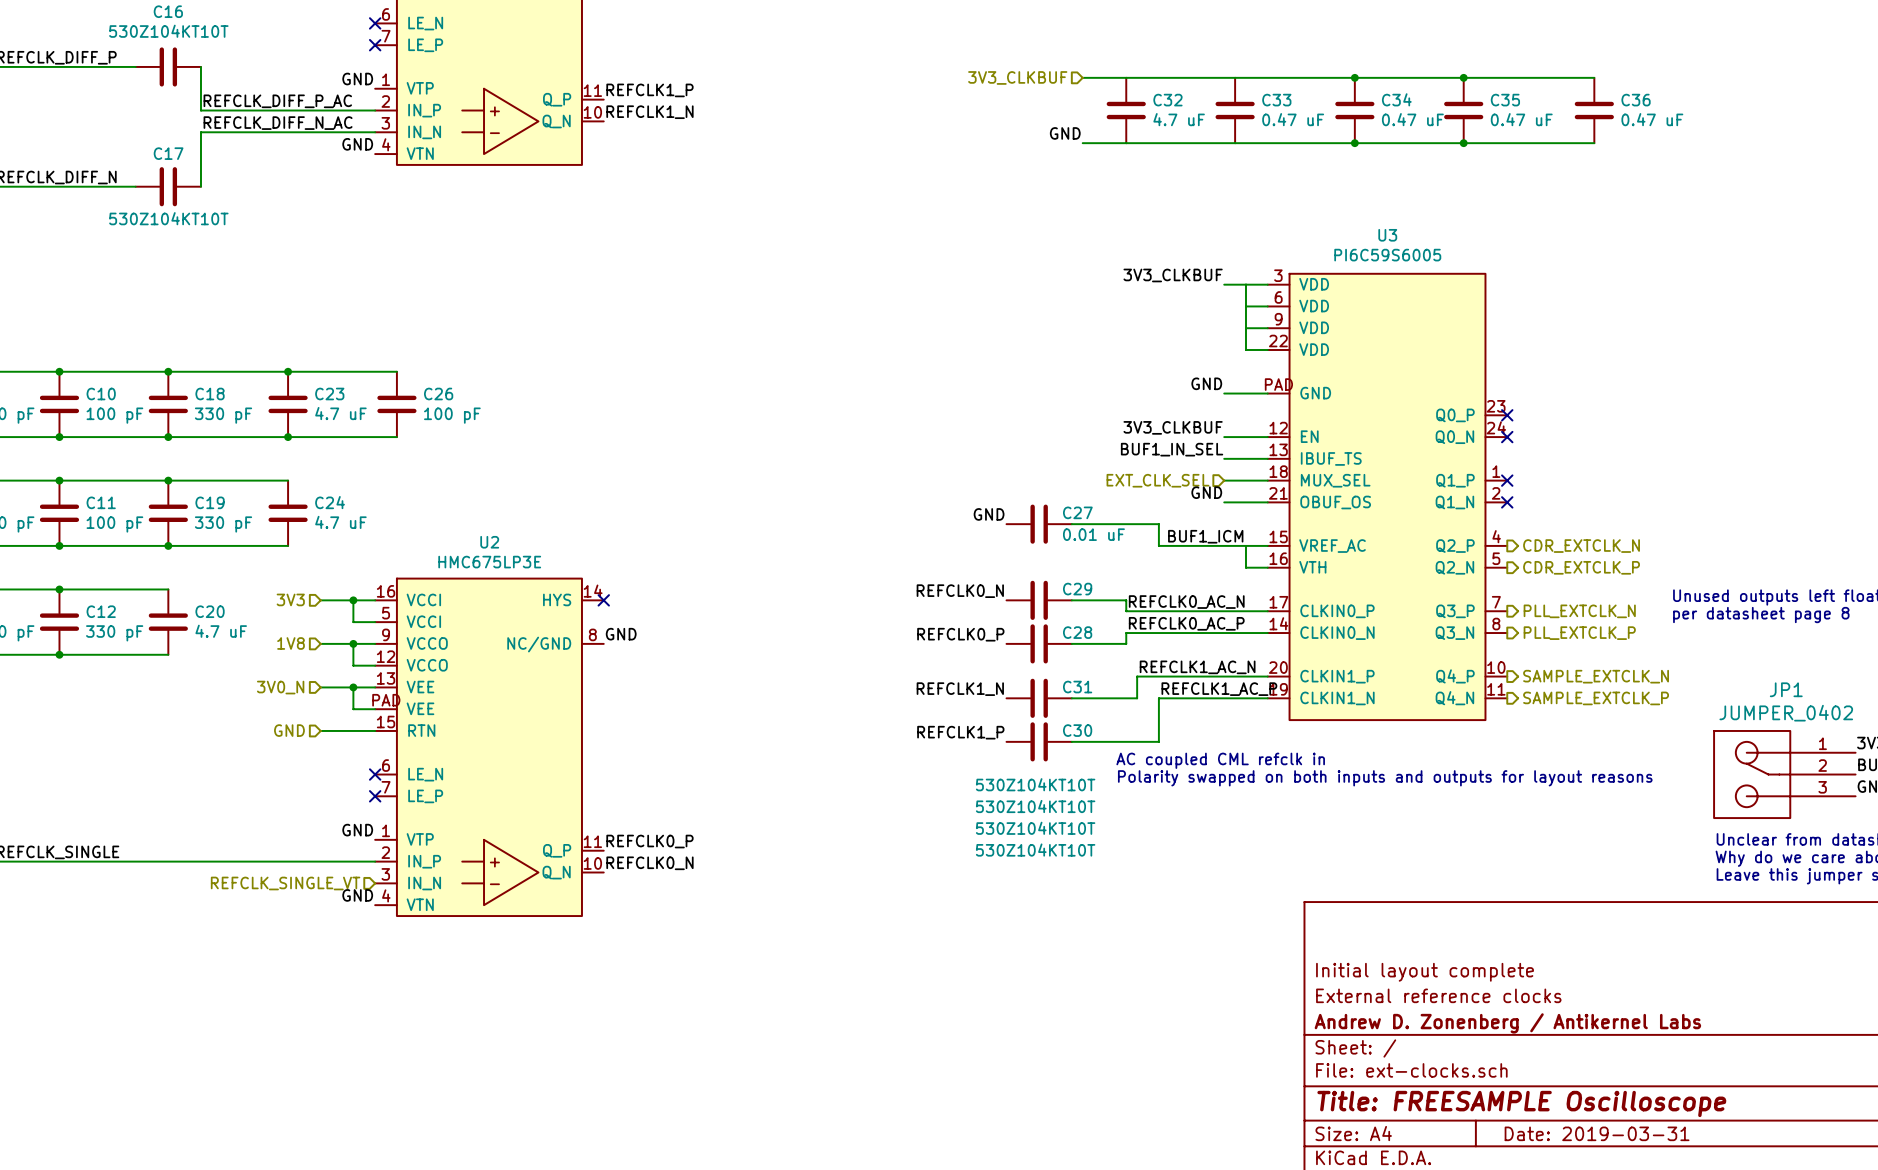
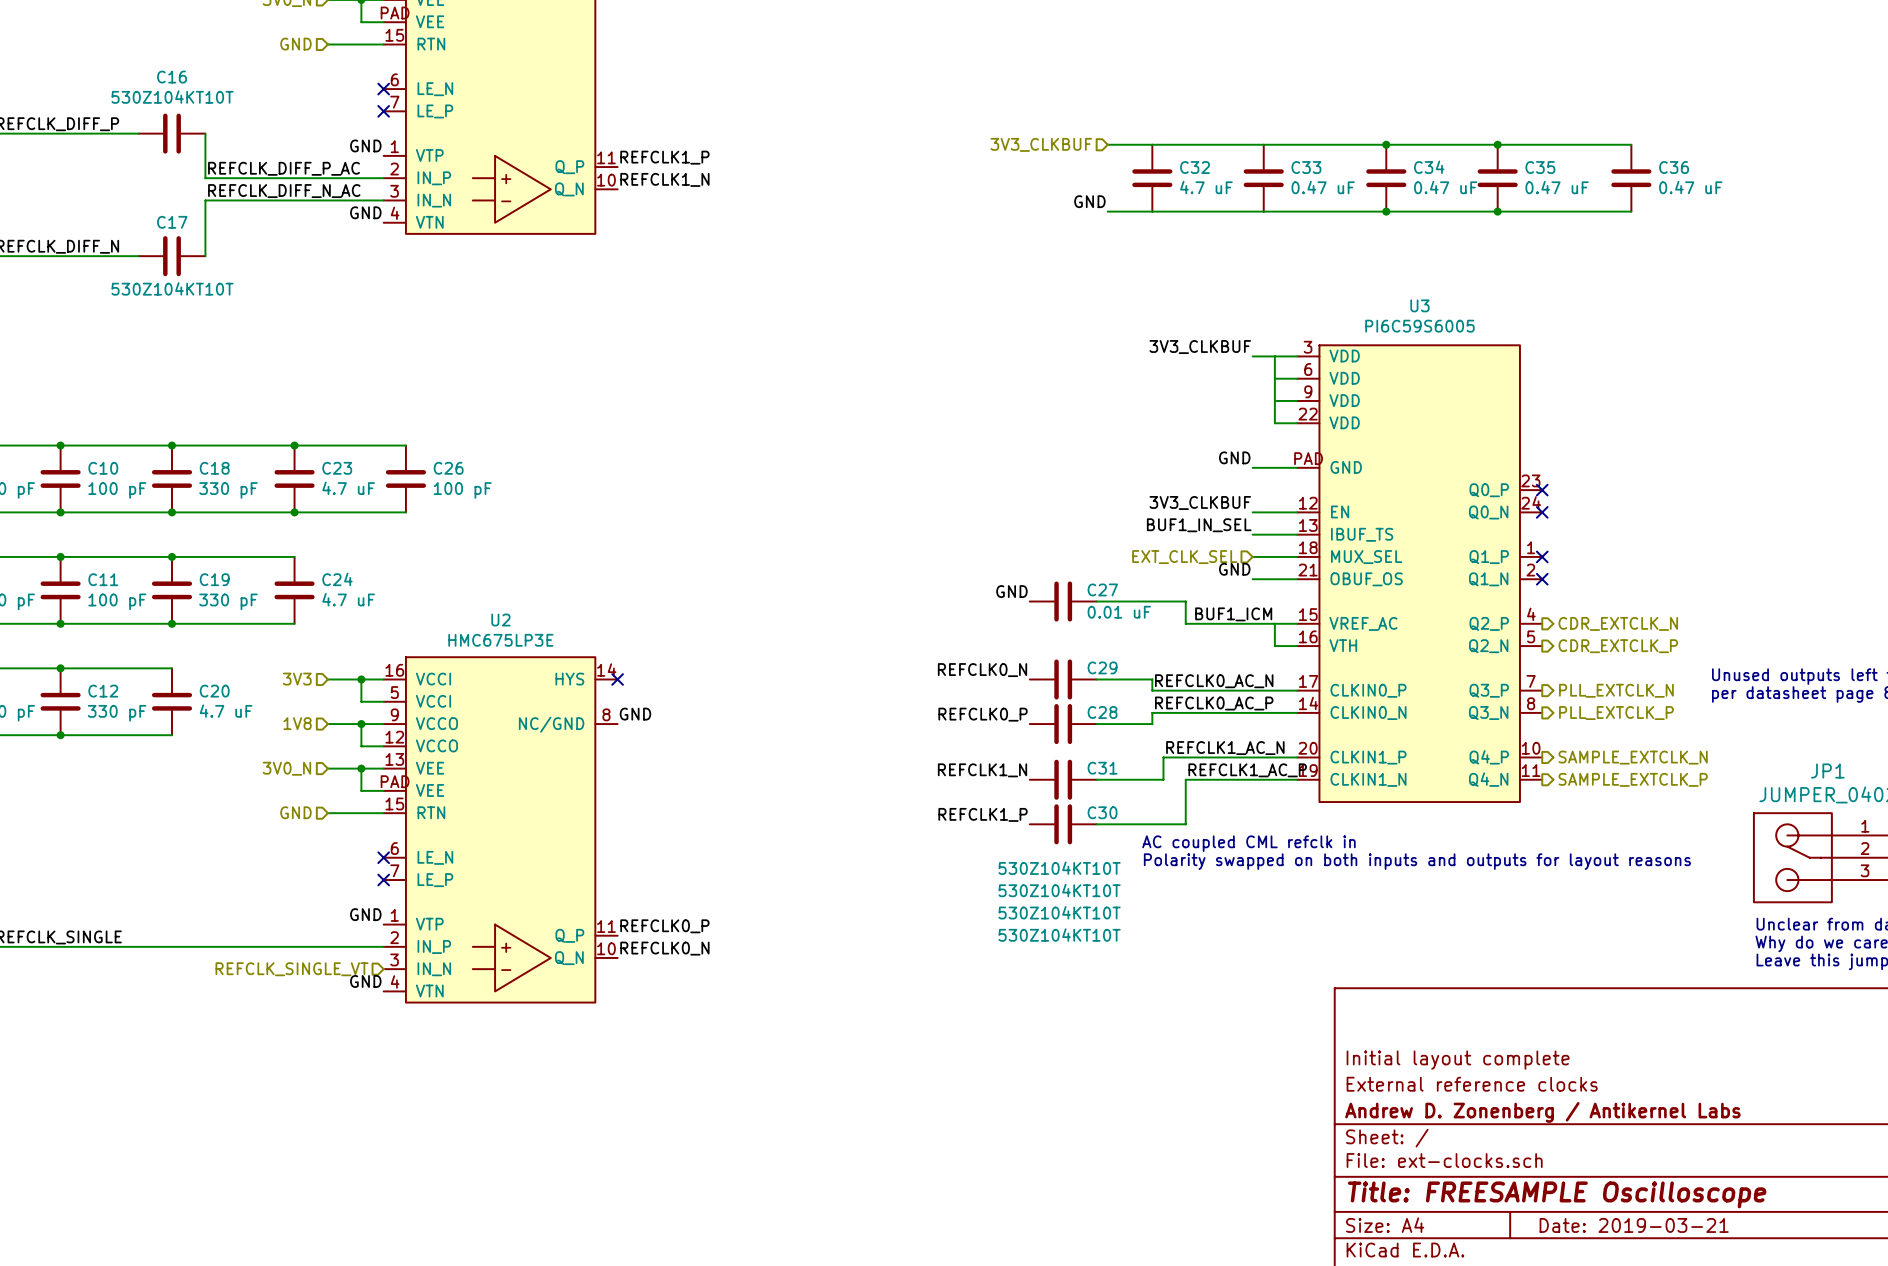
title block: Date: 2019-03-31 (1597, 1133) -> Date: 2019-03-21 (1634, 1225)

